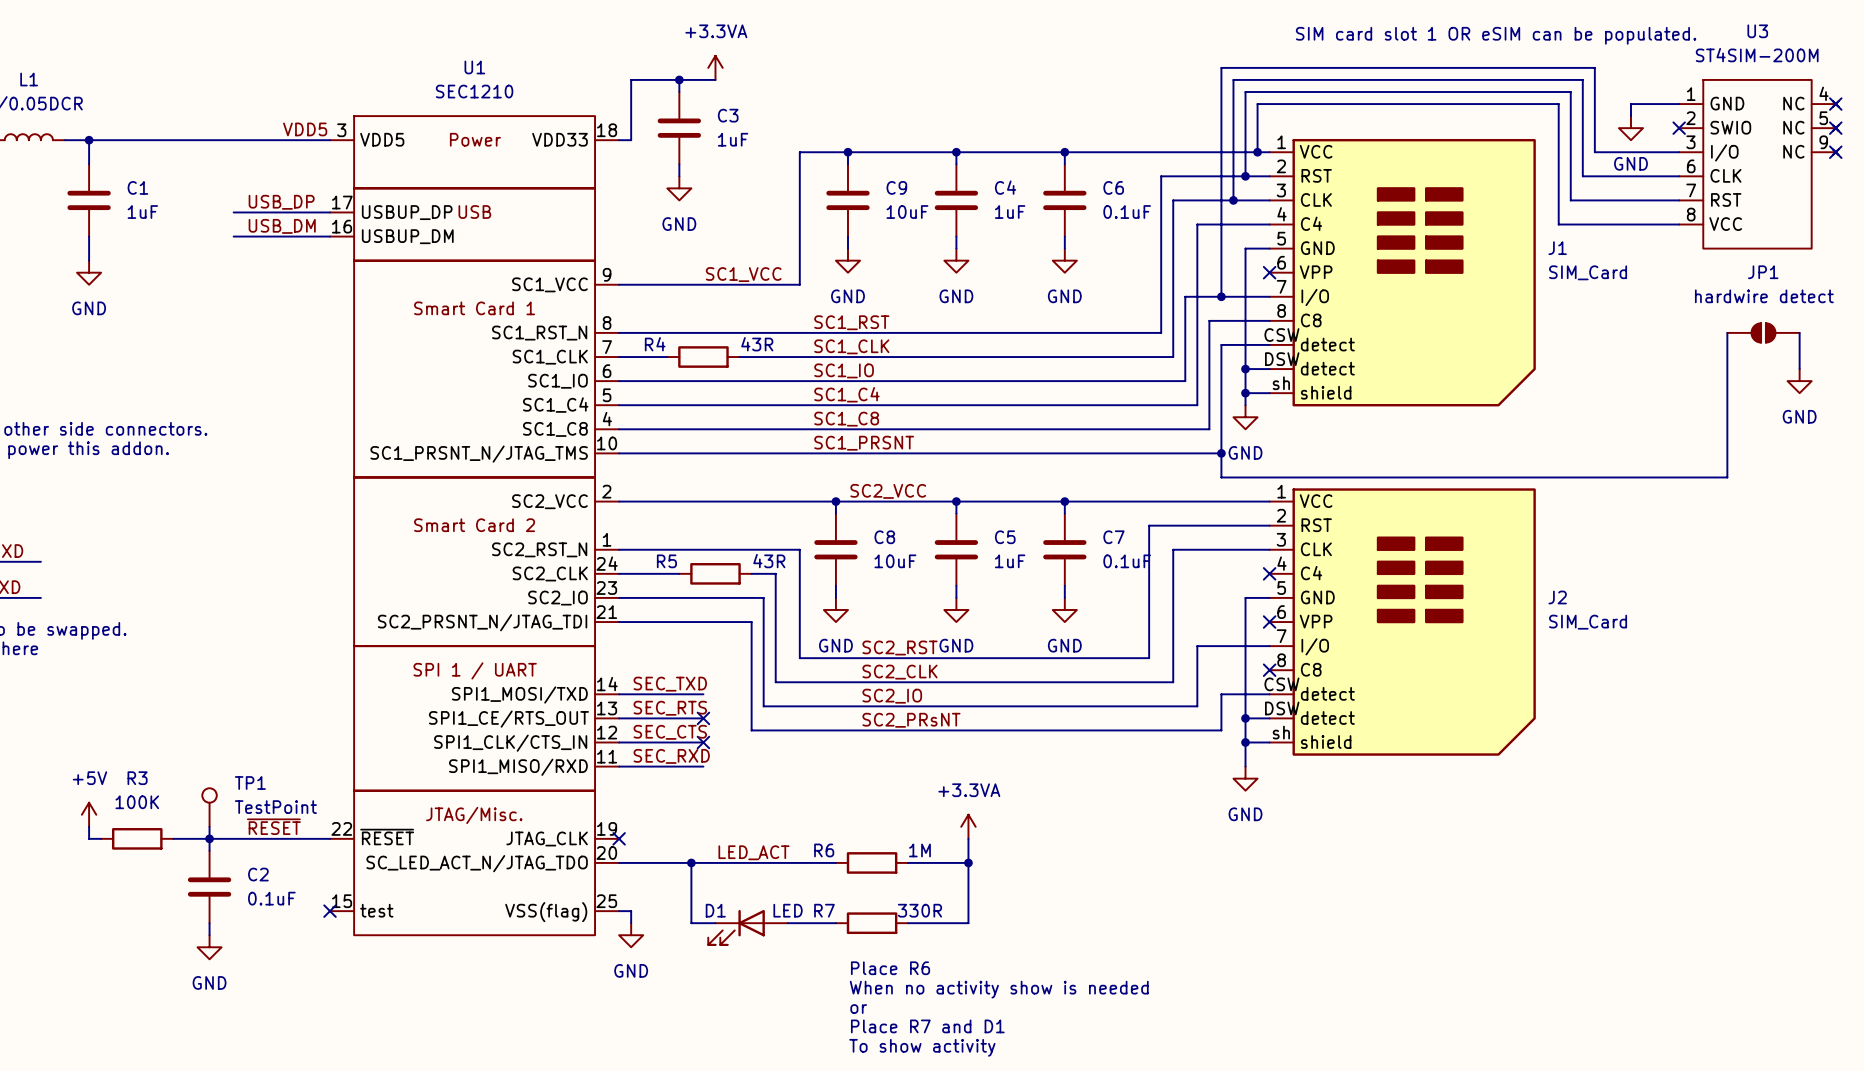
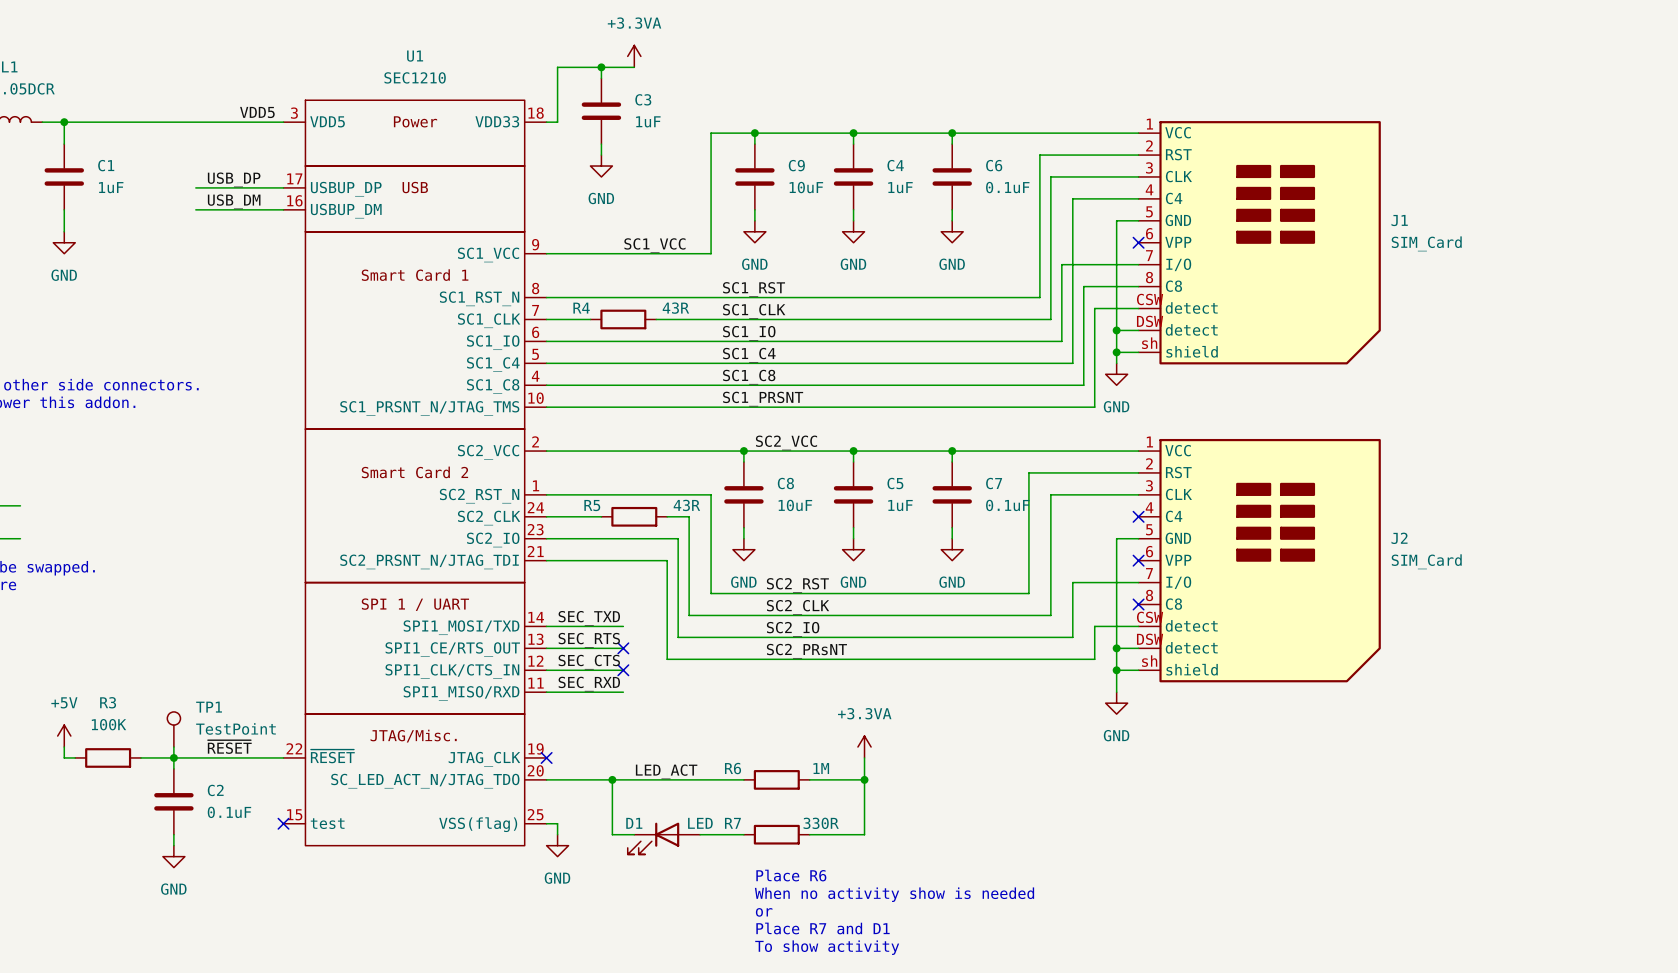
text: SIM card slot 1 OR eSIM can be populated. (1496, 35) -> none
wire: (1679, 104) (1630, 104) (1630, 116) -> none
no-connect mark: (1835, 104) -> none
power symbol: GND (1630, 128) -> none
no-connect mark: (1679, 128) -> none
no-connect mark: (1835, 128) -> none
wire: (1257, 152) (1257, 104) (1558, 104) (1558, 224) (1679, 224) -> none
junction: (1257, 152) -> none
wire: (1679, 152) (1594, 152) (1594, 67) (1221, 67) (1221, 296) -> none
no-connect mark: (1835, 152) -> none
U3: ST4SIM-200M (1758, 164) -> none
wire: (1245, 176) (1245, 92) (1570, 92) (1570, 200) (1679, 200) -> none
junction: (1245, 176) -> none
wire: (1679, 176) (1582, 176) (1582, 79) (1233, 79) (1233, 200) -> none
junction: (1233, 200) -> none
junction: (1221, 296) -> none
wire: (1727, 332) (1727, 477) (1221, 477) (1221, 453) -> none
JP1: hardwire detect (1763, 332) -> none
wire: (1799, 332) (1799, 369) -> none
power symbol: GND (1799, 381) -> none
junction: (1221, 453) -> none

